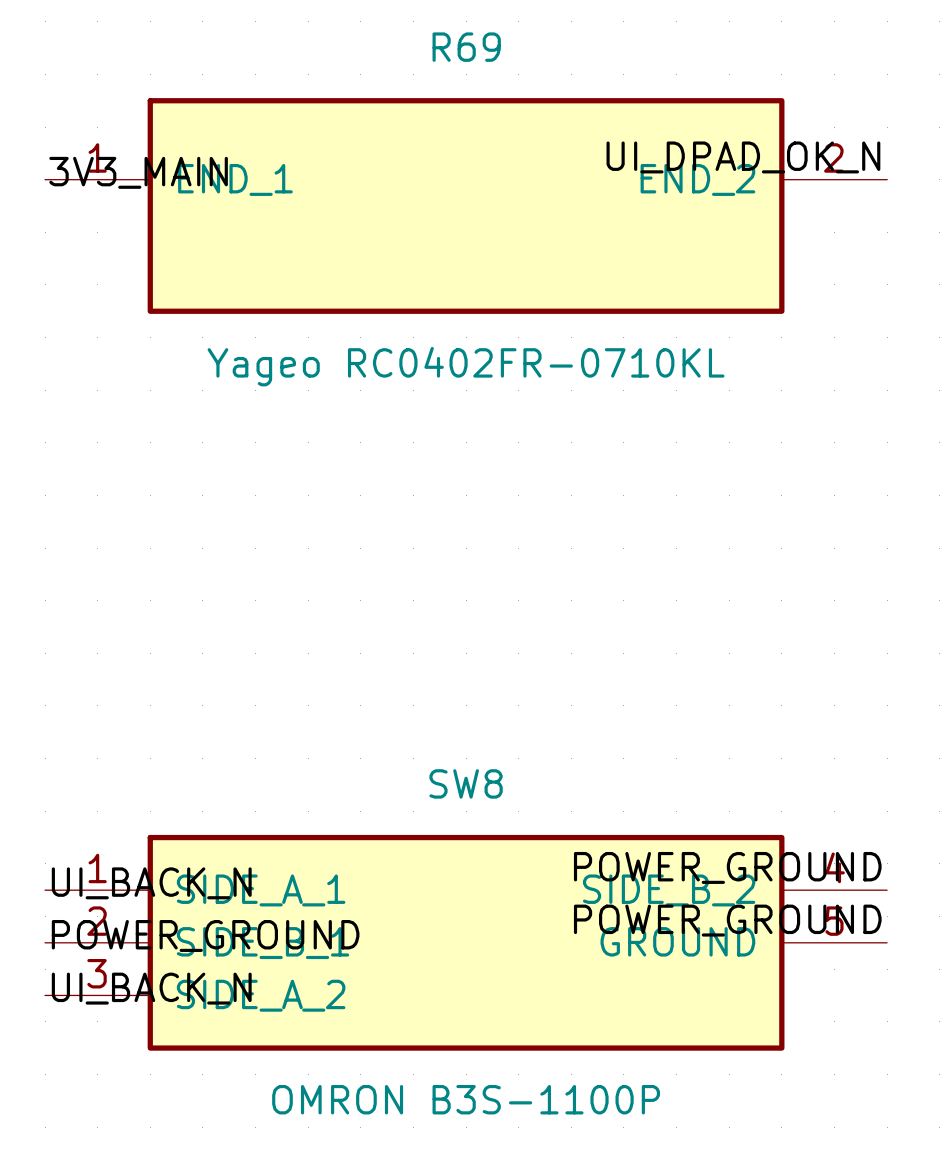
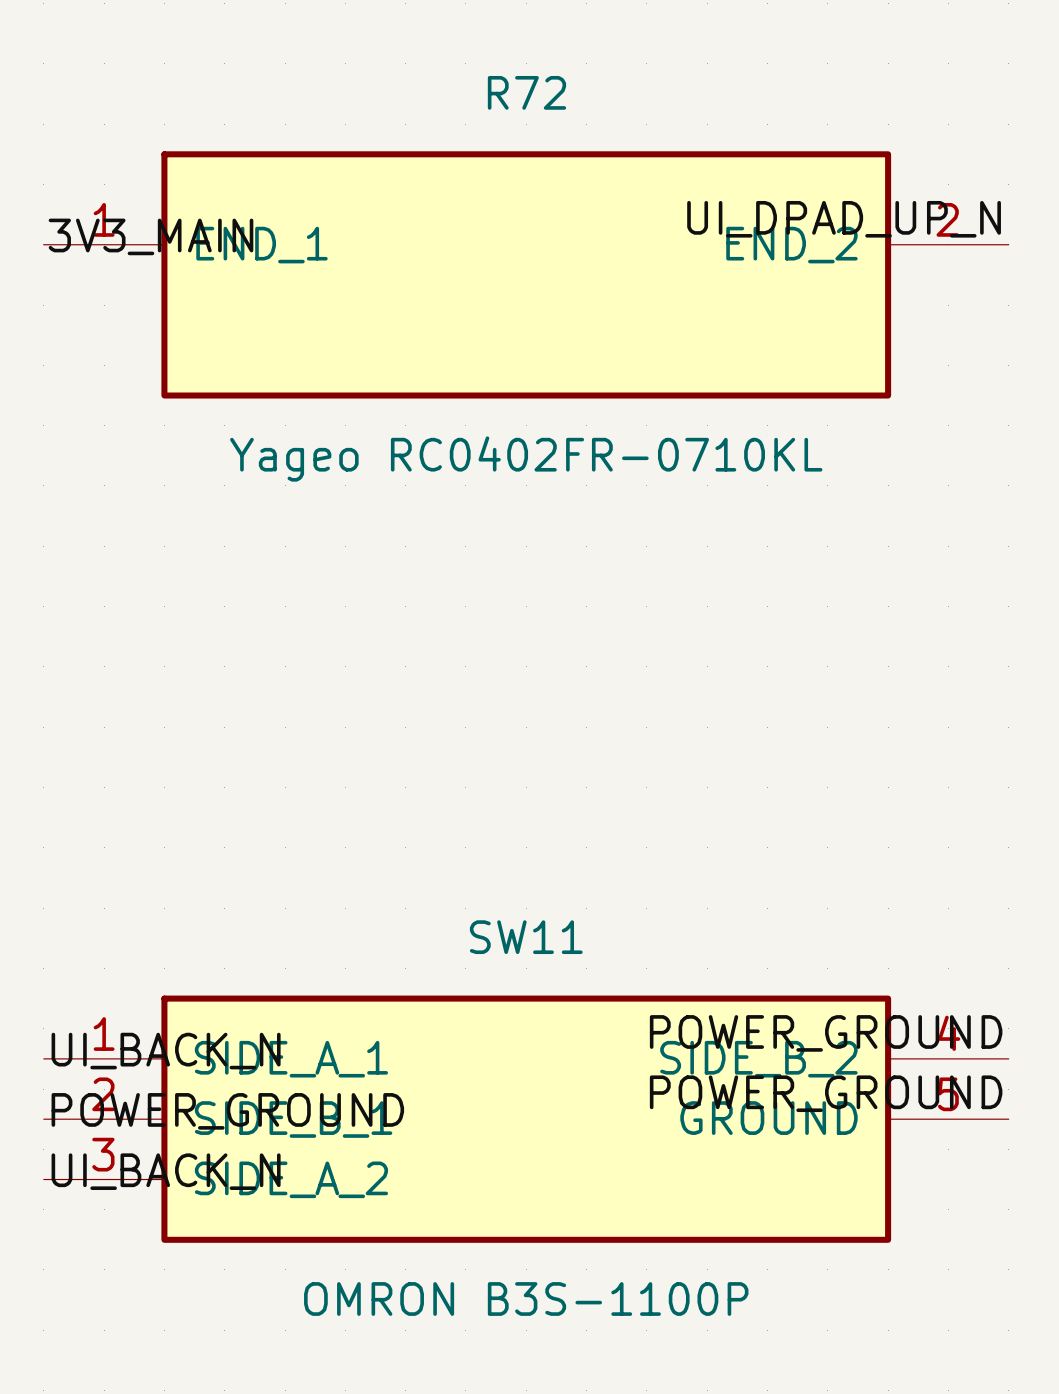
R69 name: R69 (466, 47) -> R72 (526, 92)
label: UI_DPAD_OK_N (743, 157) -> UI_DPAD_UP_N (844, 219)
SW8 name: SW8 (466, 783) -> SW11 (526, 937)

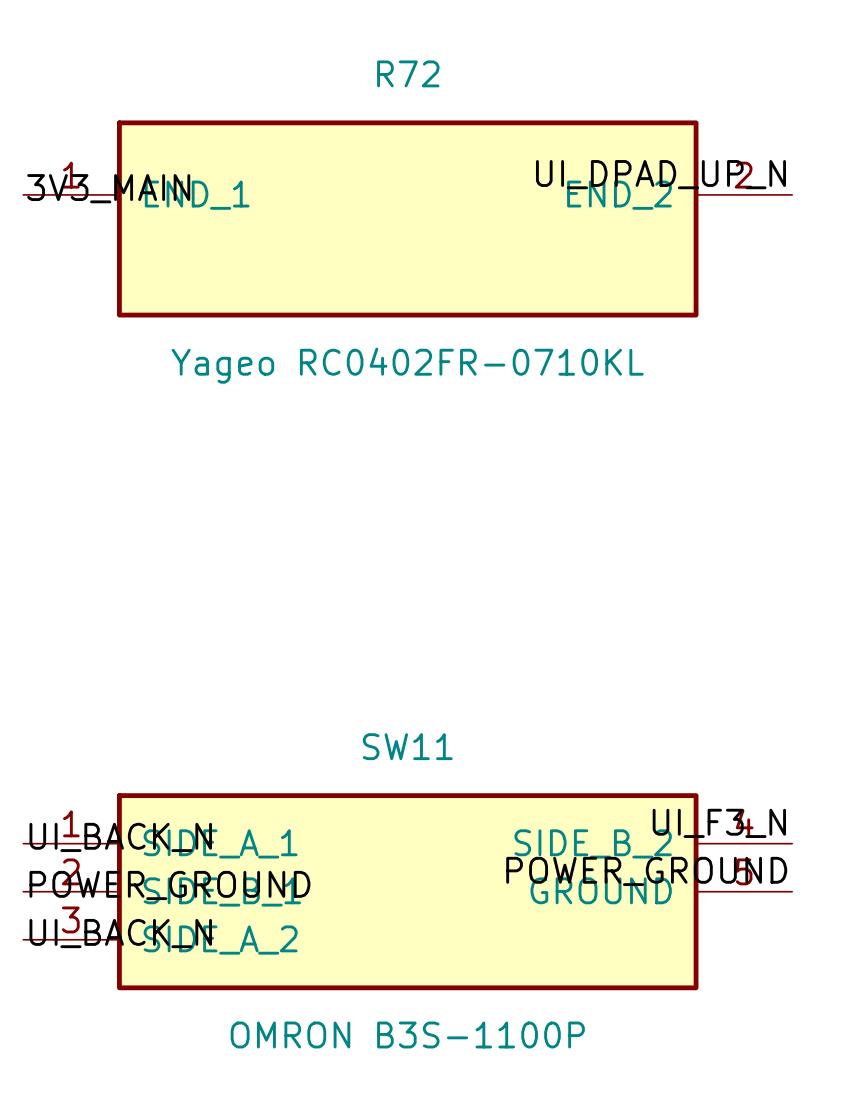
label: POWER_GROUND (826, 1033) -> UI_F3_N (719, 823)

